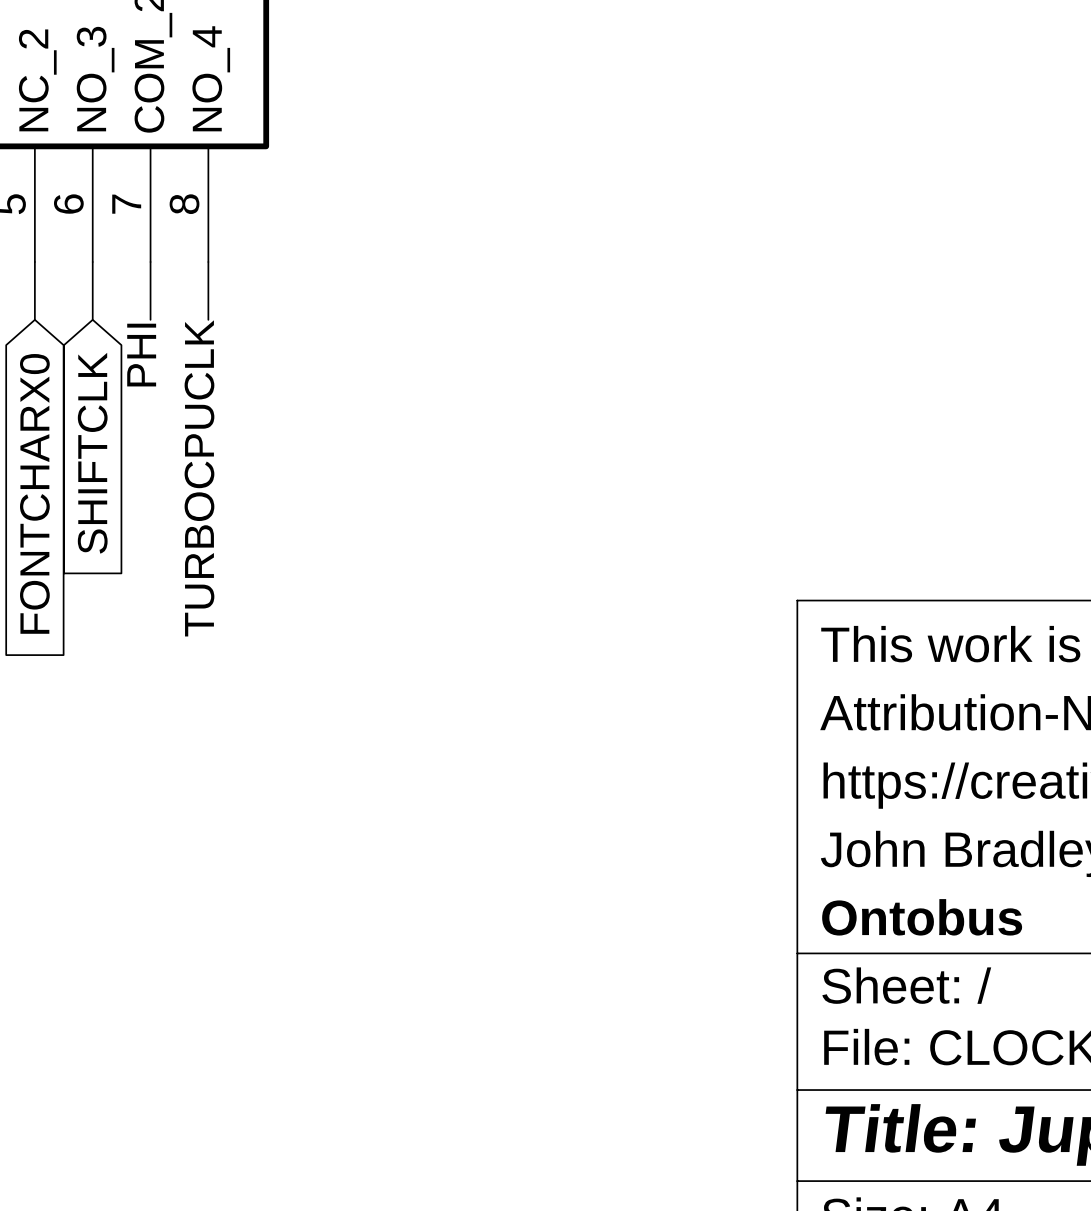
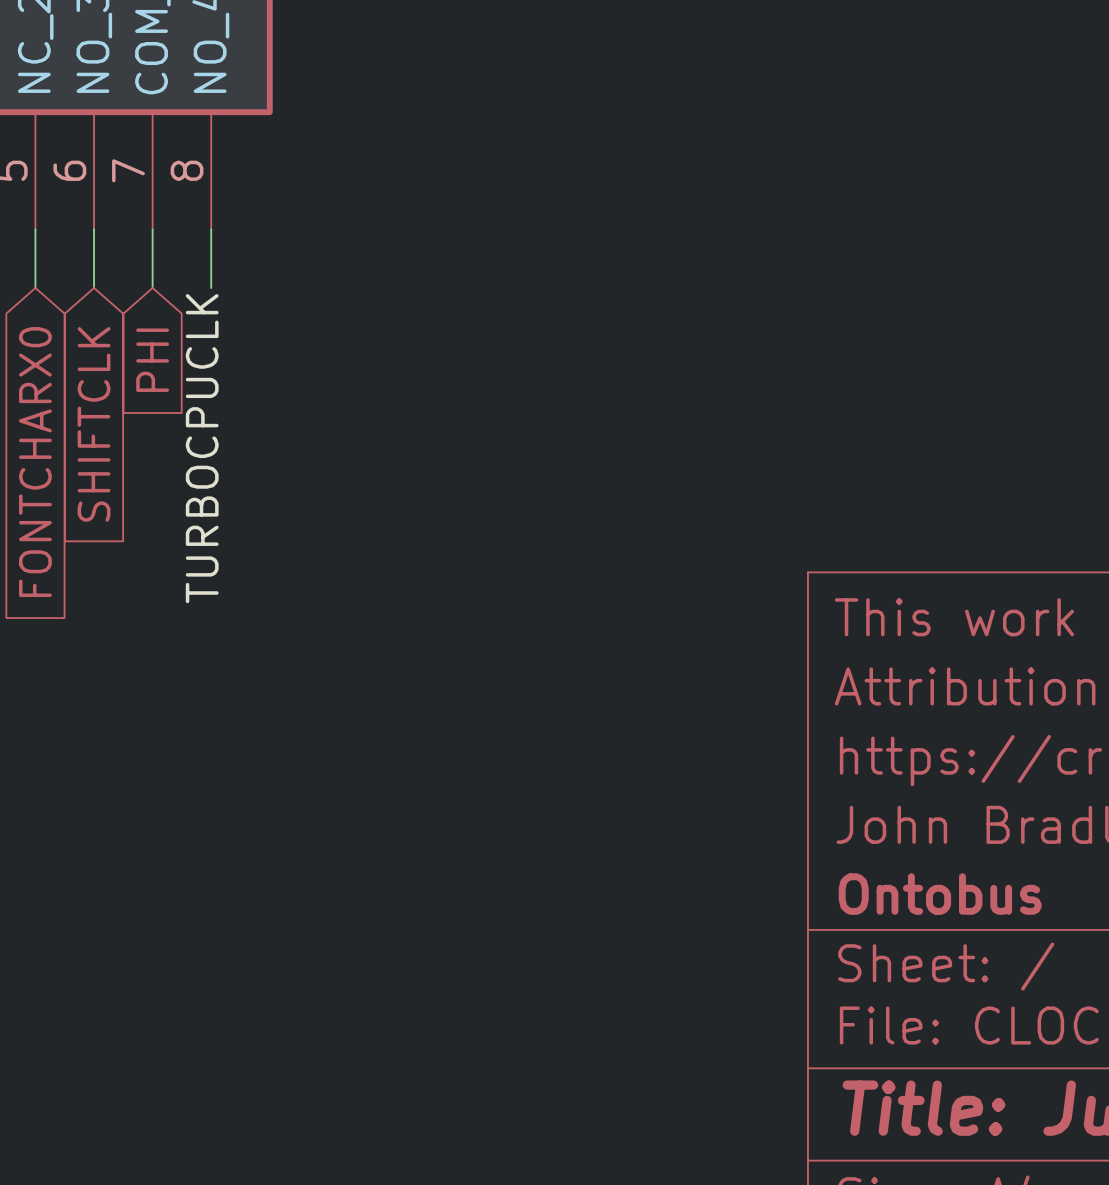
label: PHI (141, 355) -> none
global label: none -> PHI (152, 360)

